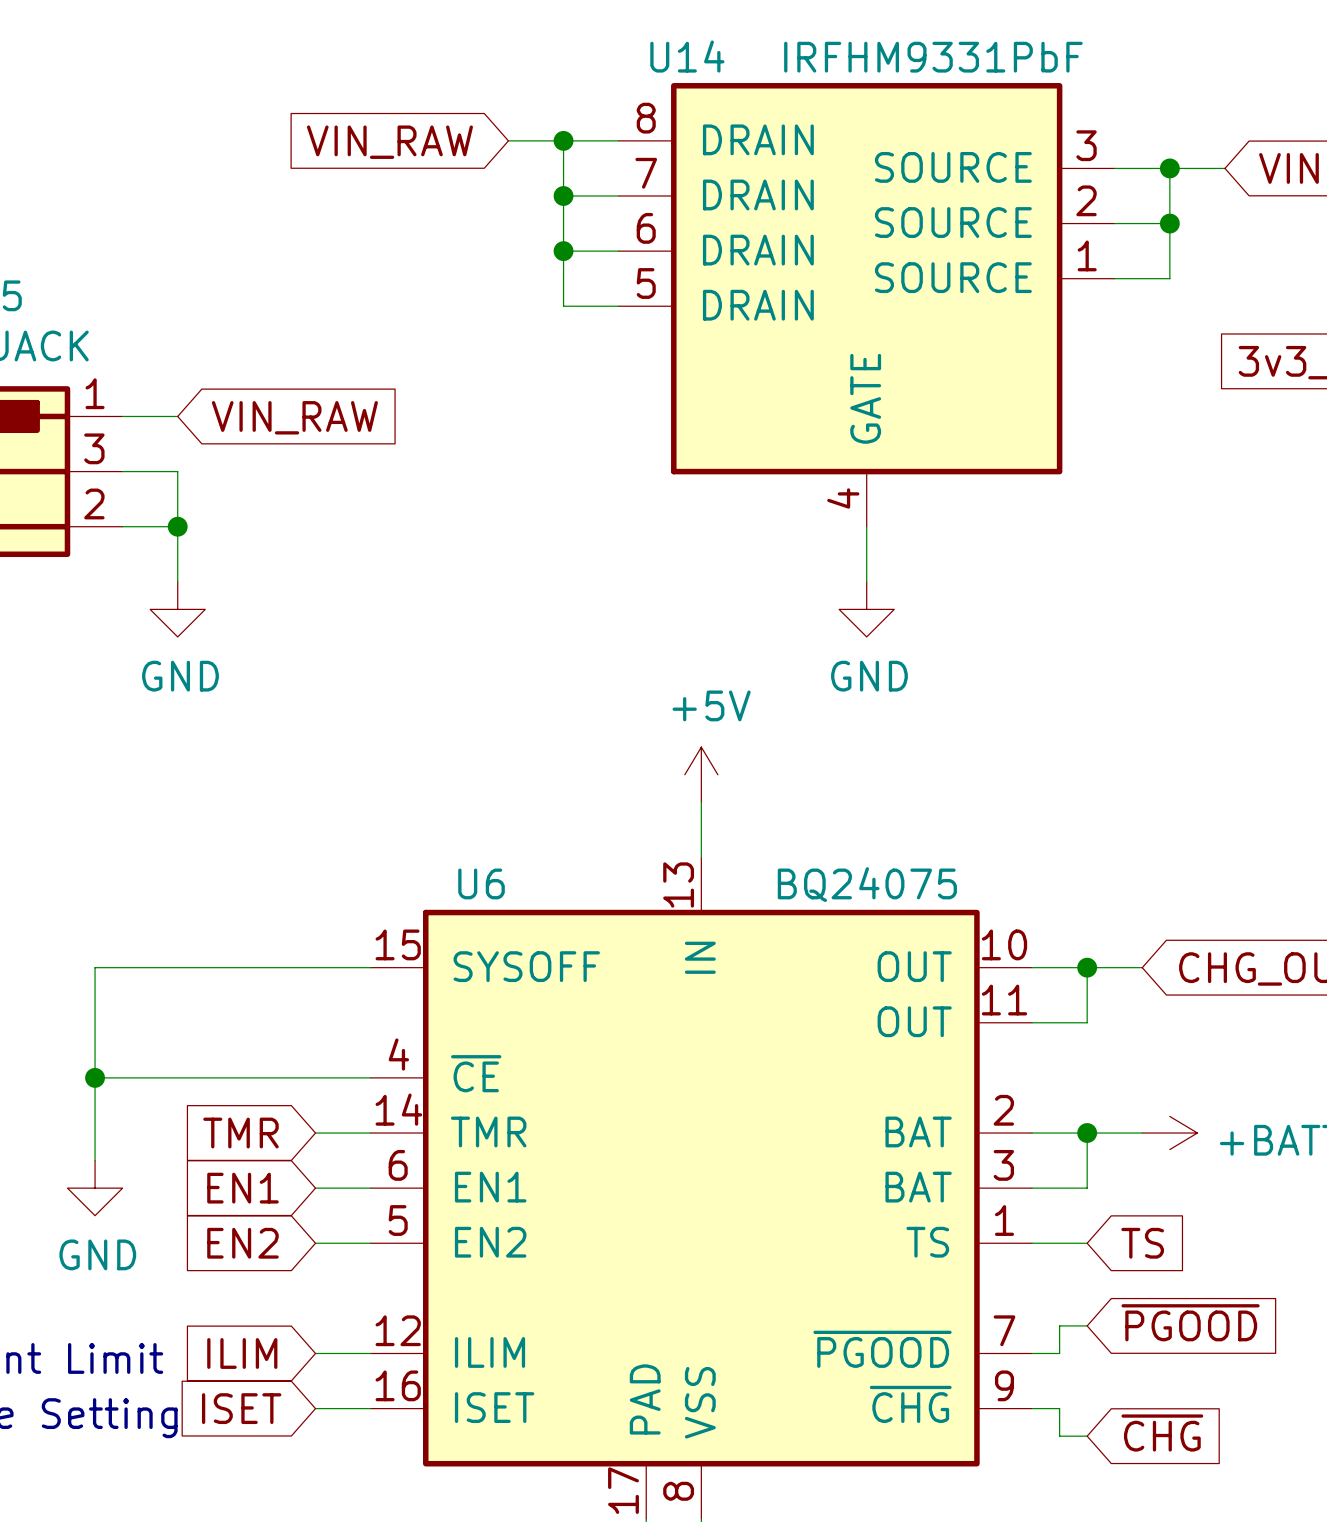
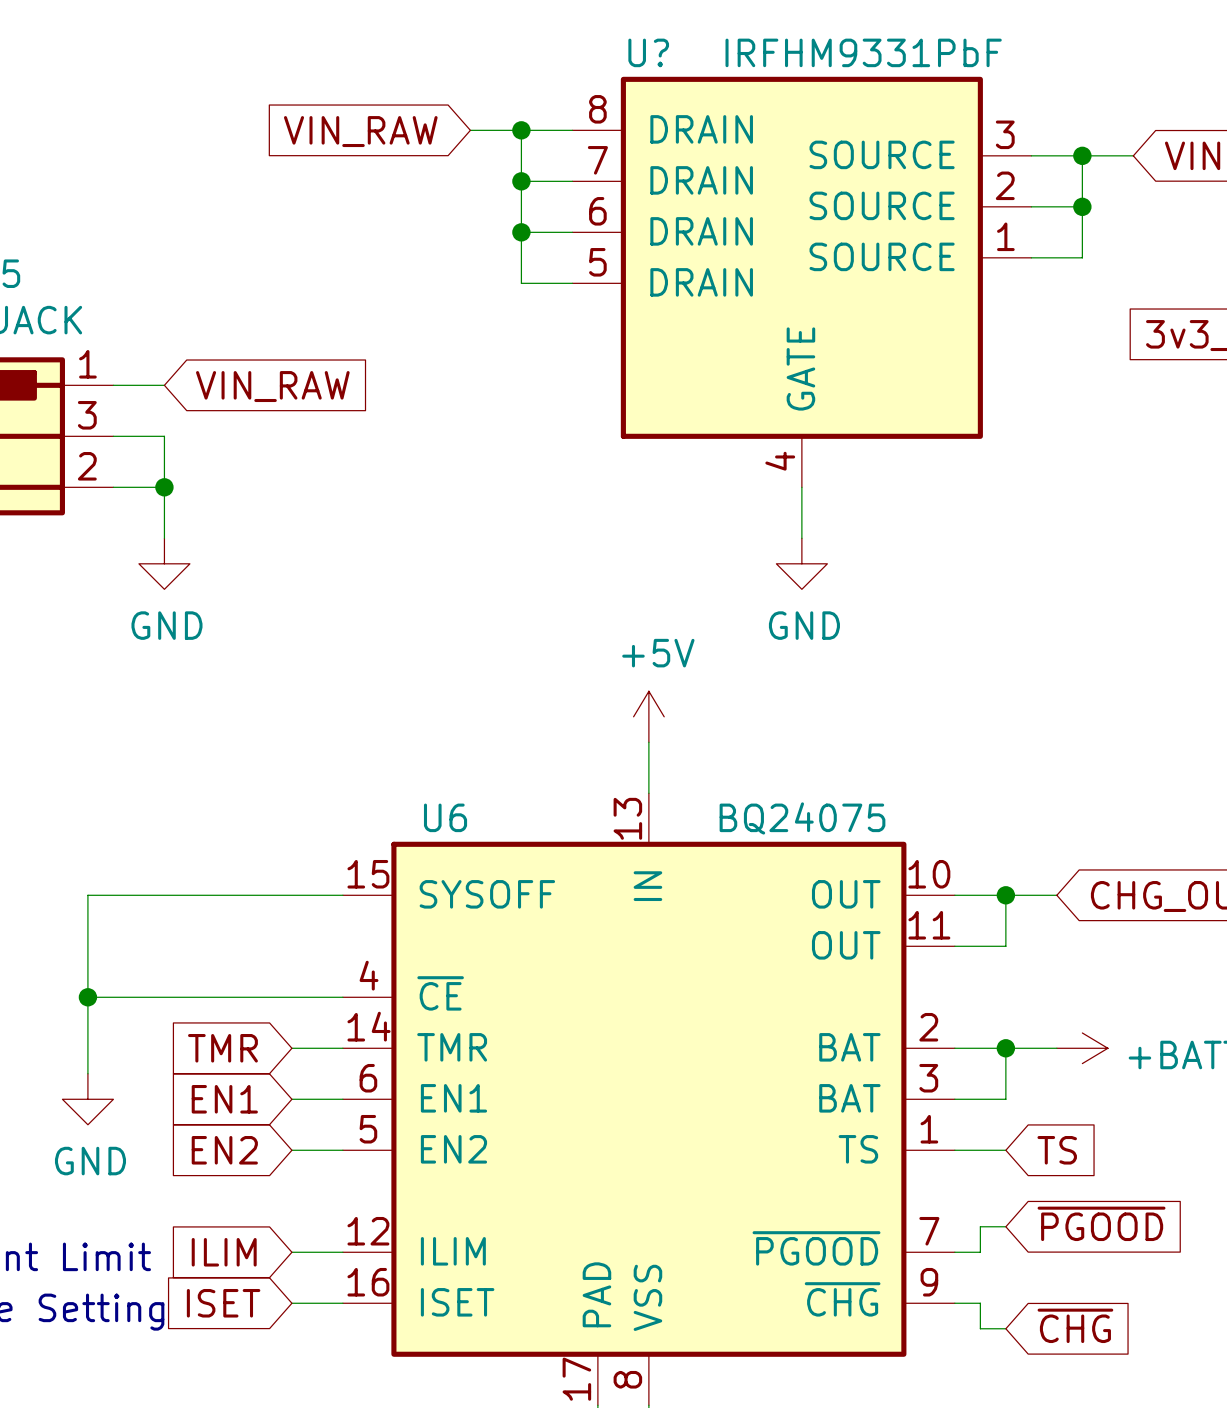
U14 name: U14 (687, 56) -> U? (648, 52)

